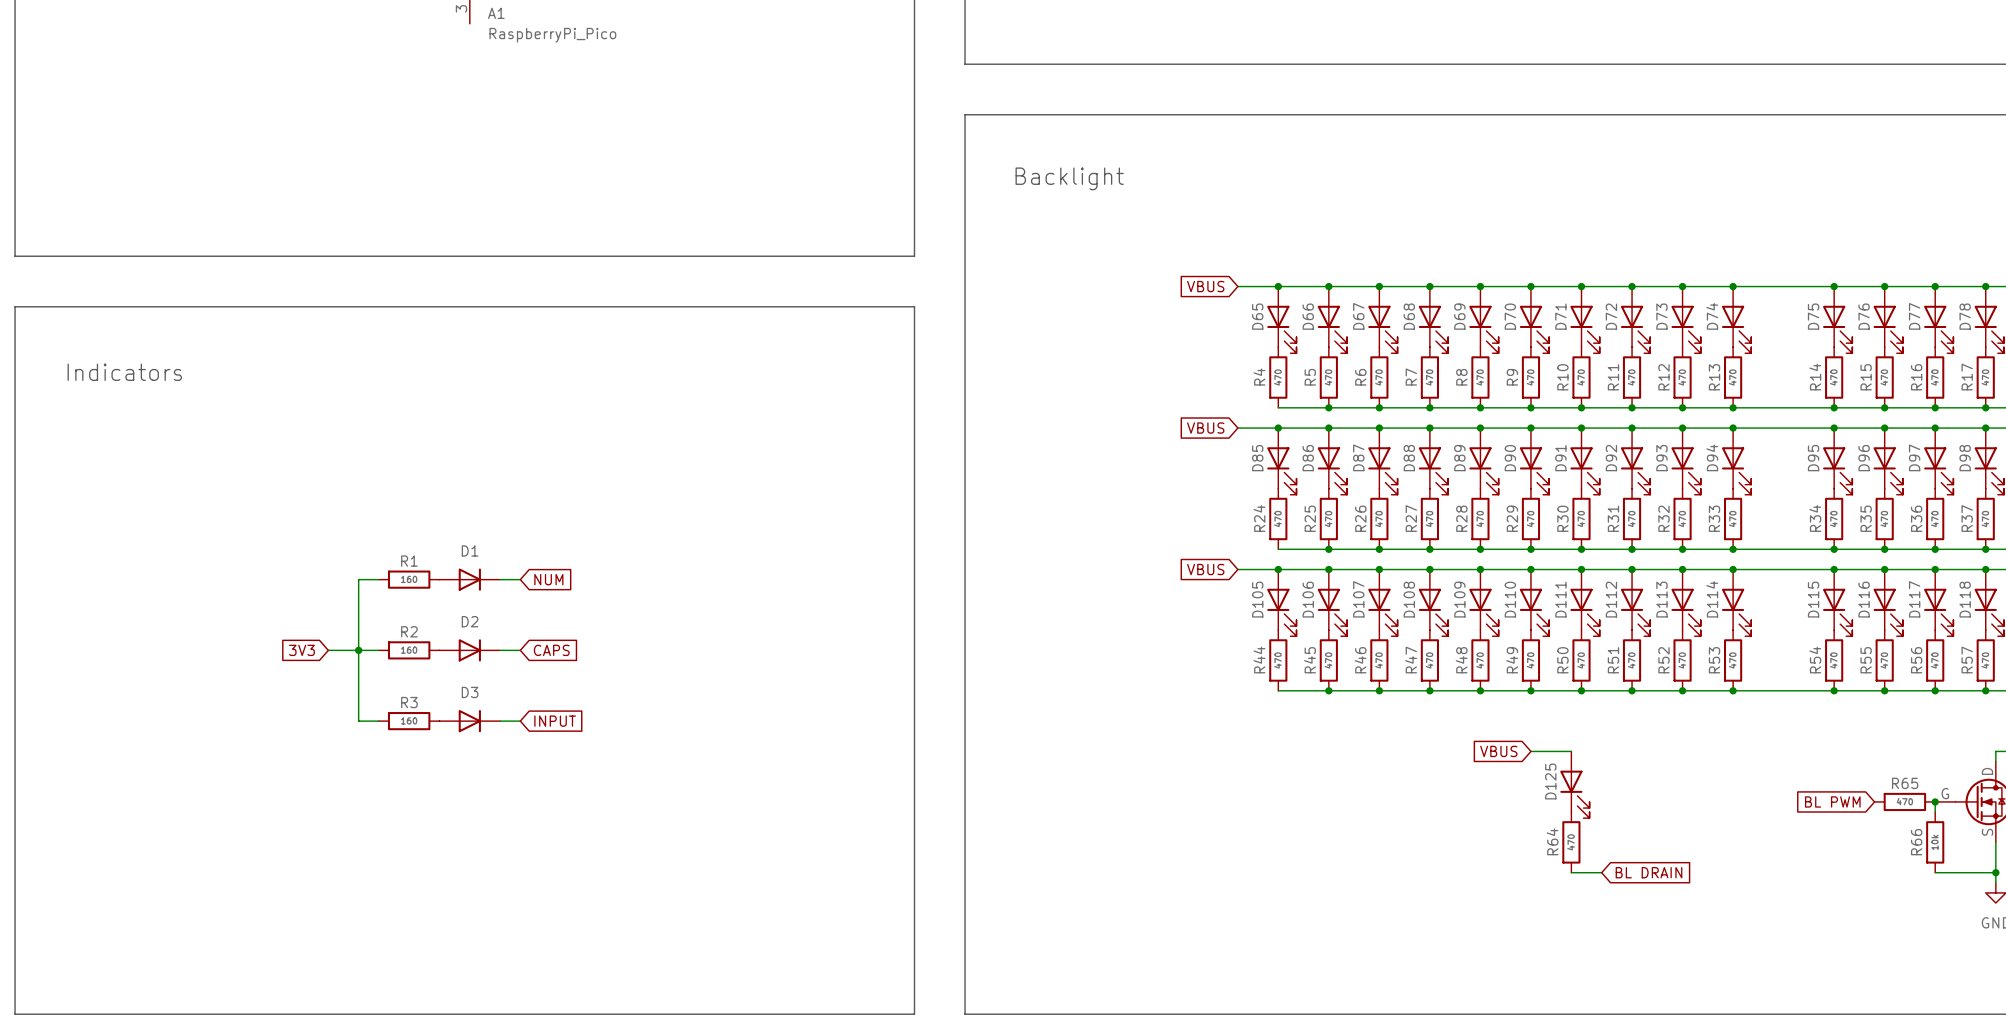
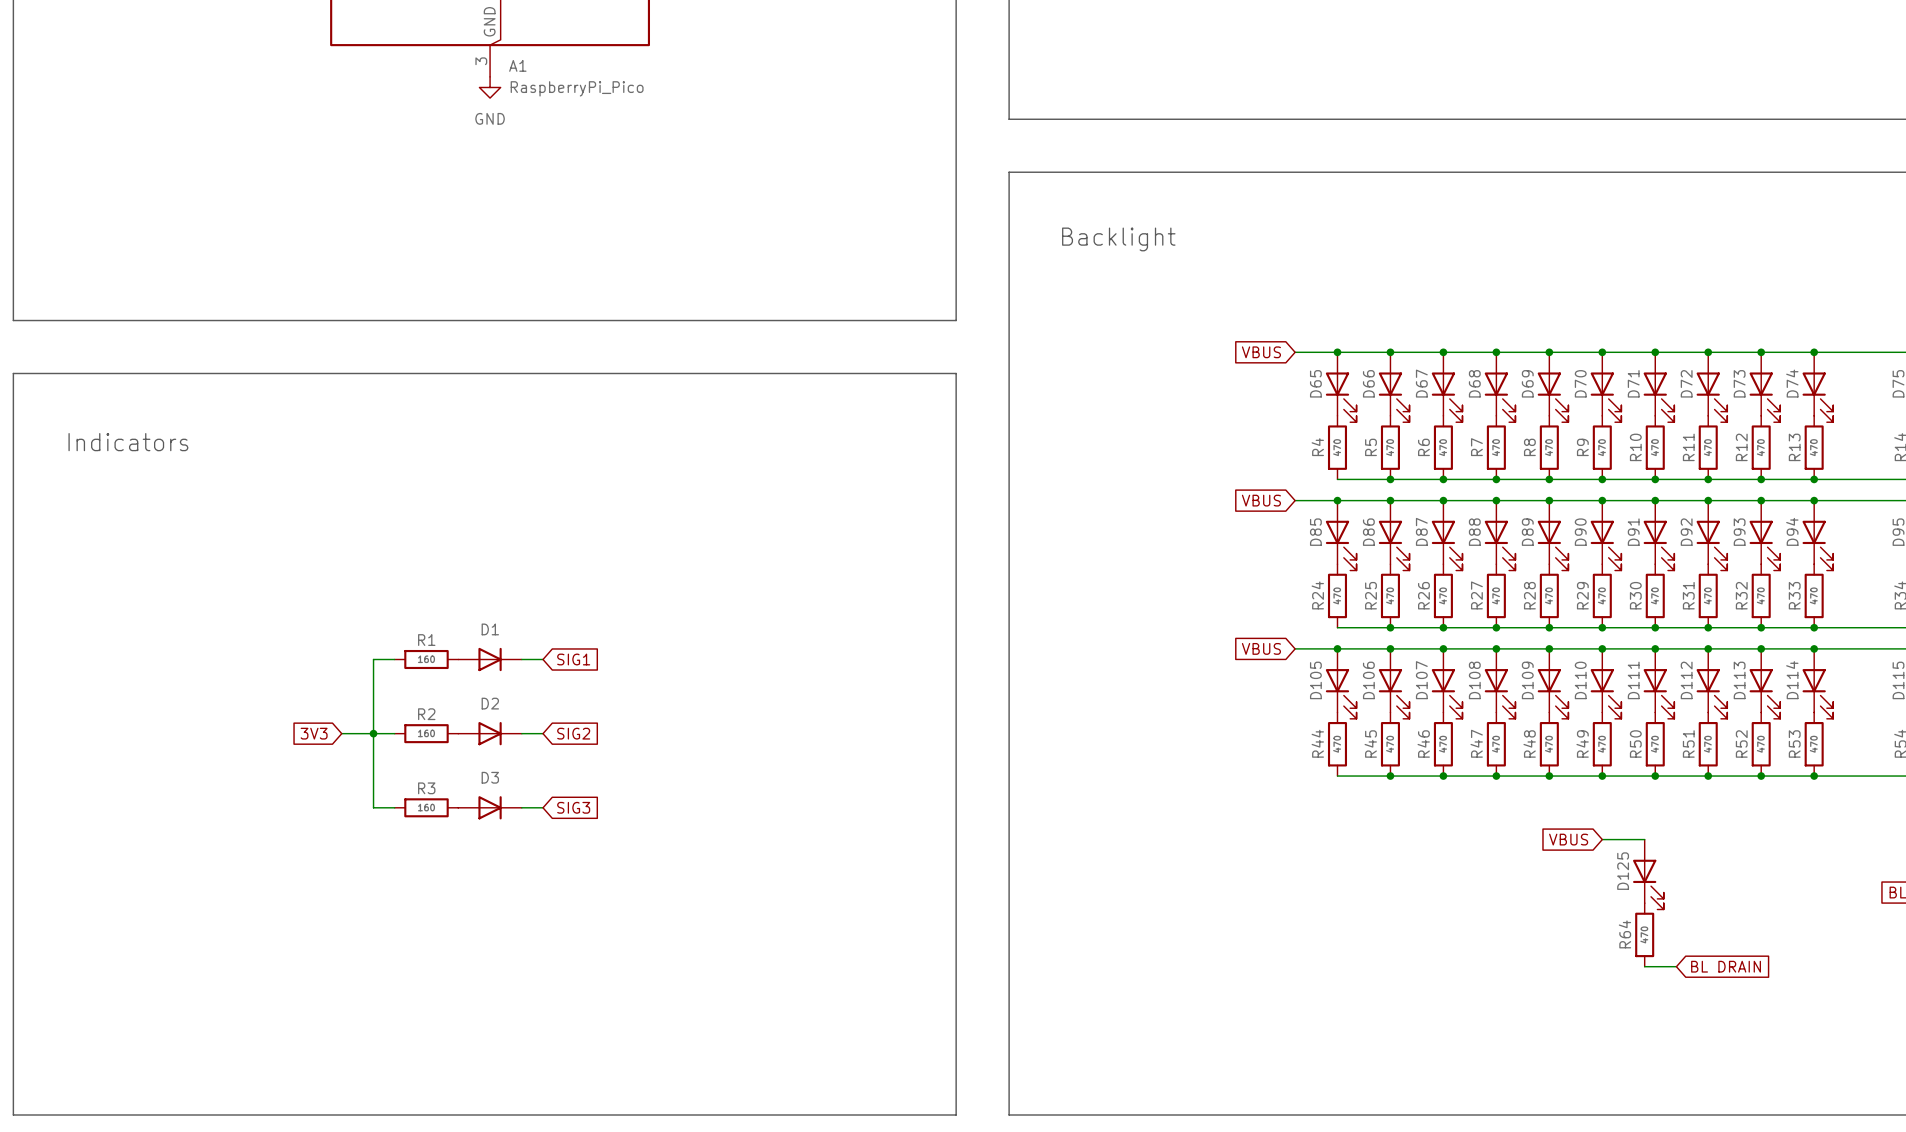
power symbol: none -> GND (490, 87)
global label: NUM (548, 579) -> SIG1 (573, 659)
global label: CAPS (551, 650) -> SIG2 (573, 733)
global label: INPUT (555, 721) -> SIG3 (573, 807)

